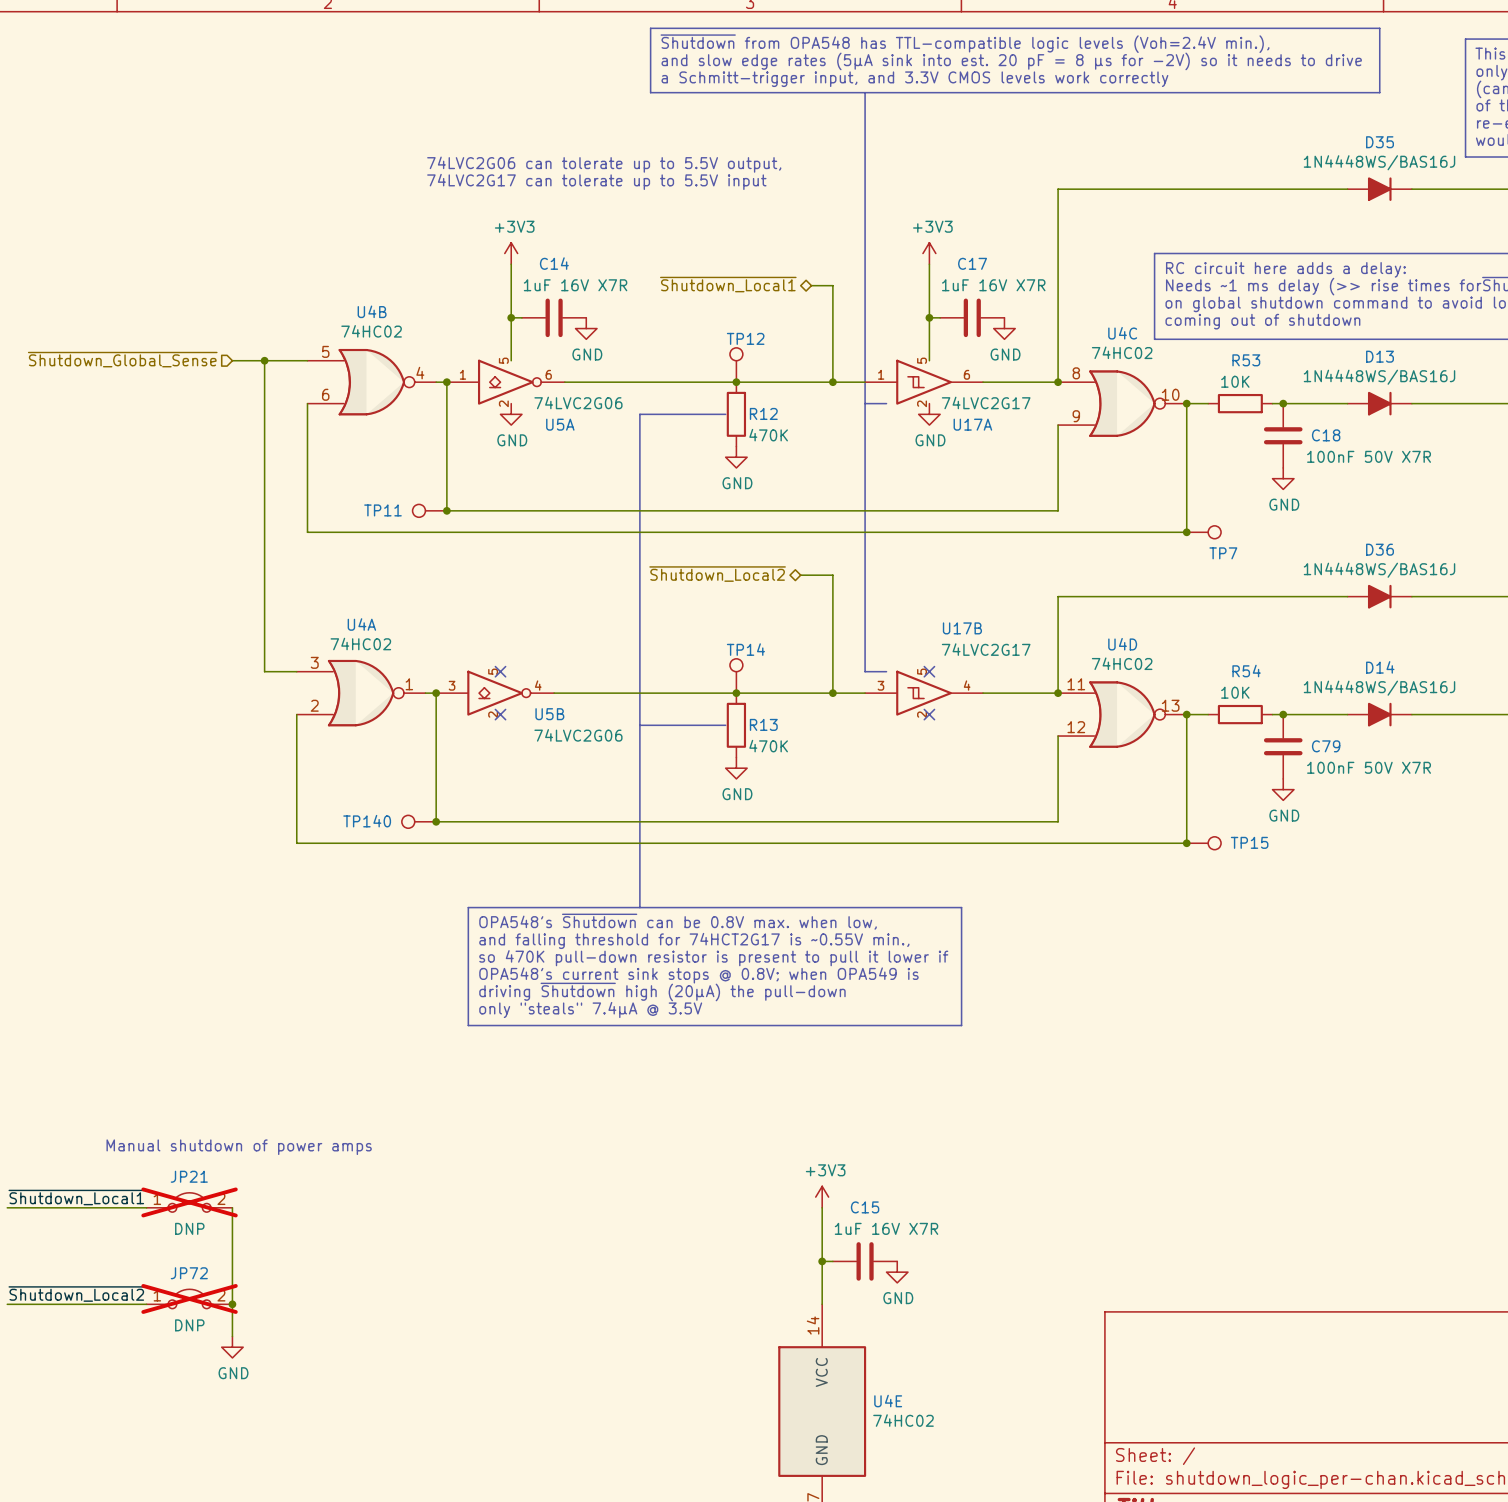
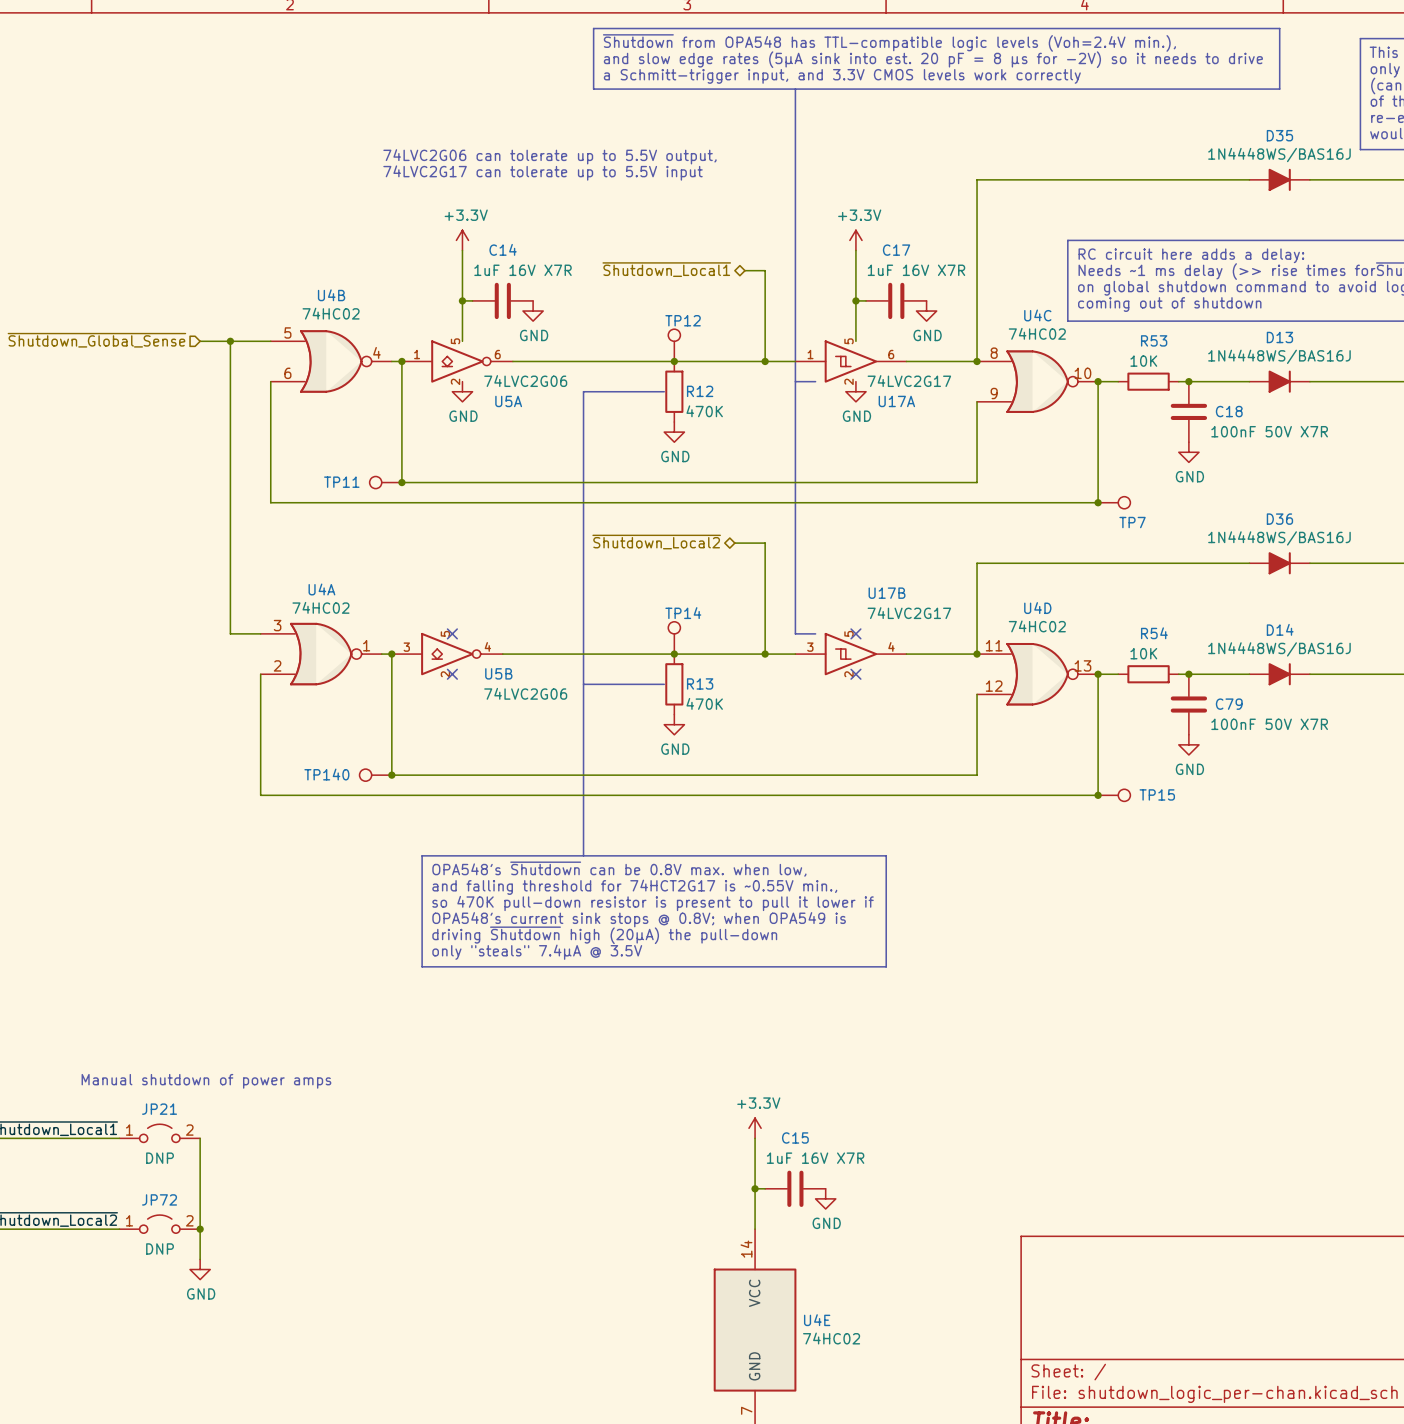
power symbol: +3V3 (511, 253) -> +3.3V (462, 240)
power symbol: +3V3 (929, 253) -> +3.3V (855, 240)
power symbol: +3V3 (822, 1197) -> +3.3V (755, 1128)
JP21 do-not-place cross: (189, 1202) -> none
JP72 do-not-place cross: (189, 1298) -> none

